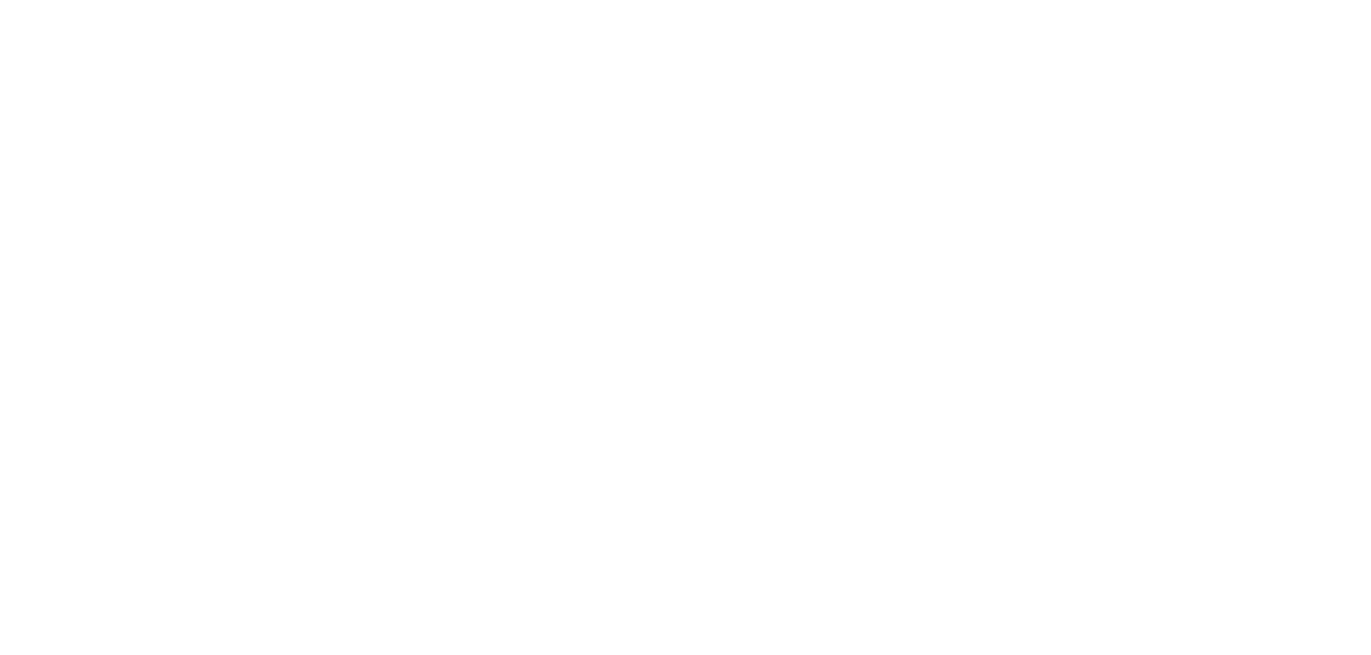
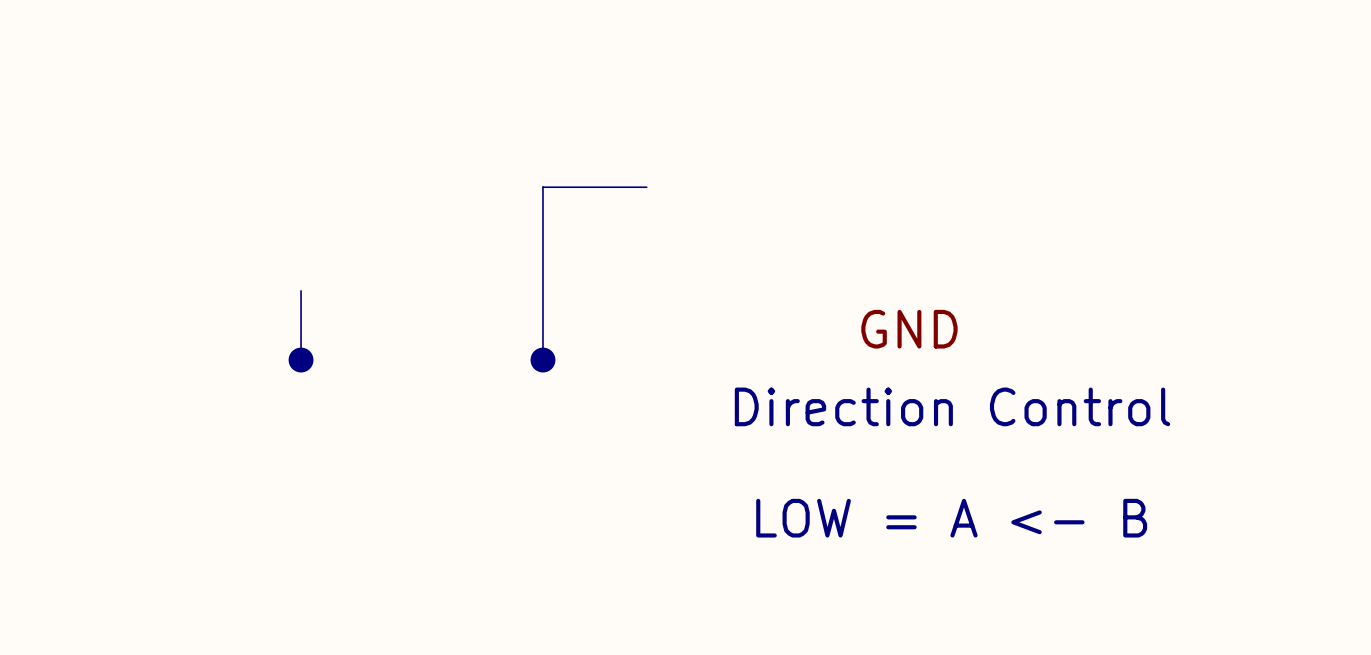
wire: none -> (646, 187) (542, 187) (542, 360)
wire: none -> (301, 290) (301, 360)
label: none -> GND (909, 329)
junction: none -> (301, 360)
junction: none -> (542, 360)
text: none -> Direction Control (952, 406)
text: none -> LOW = A <- B (951, 518)

